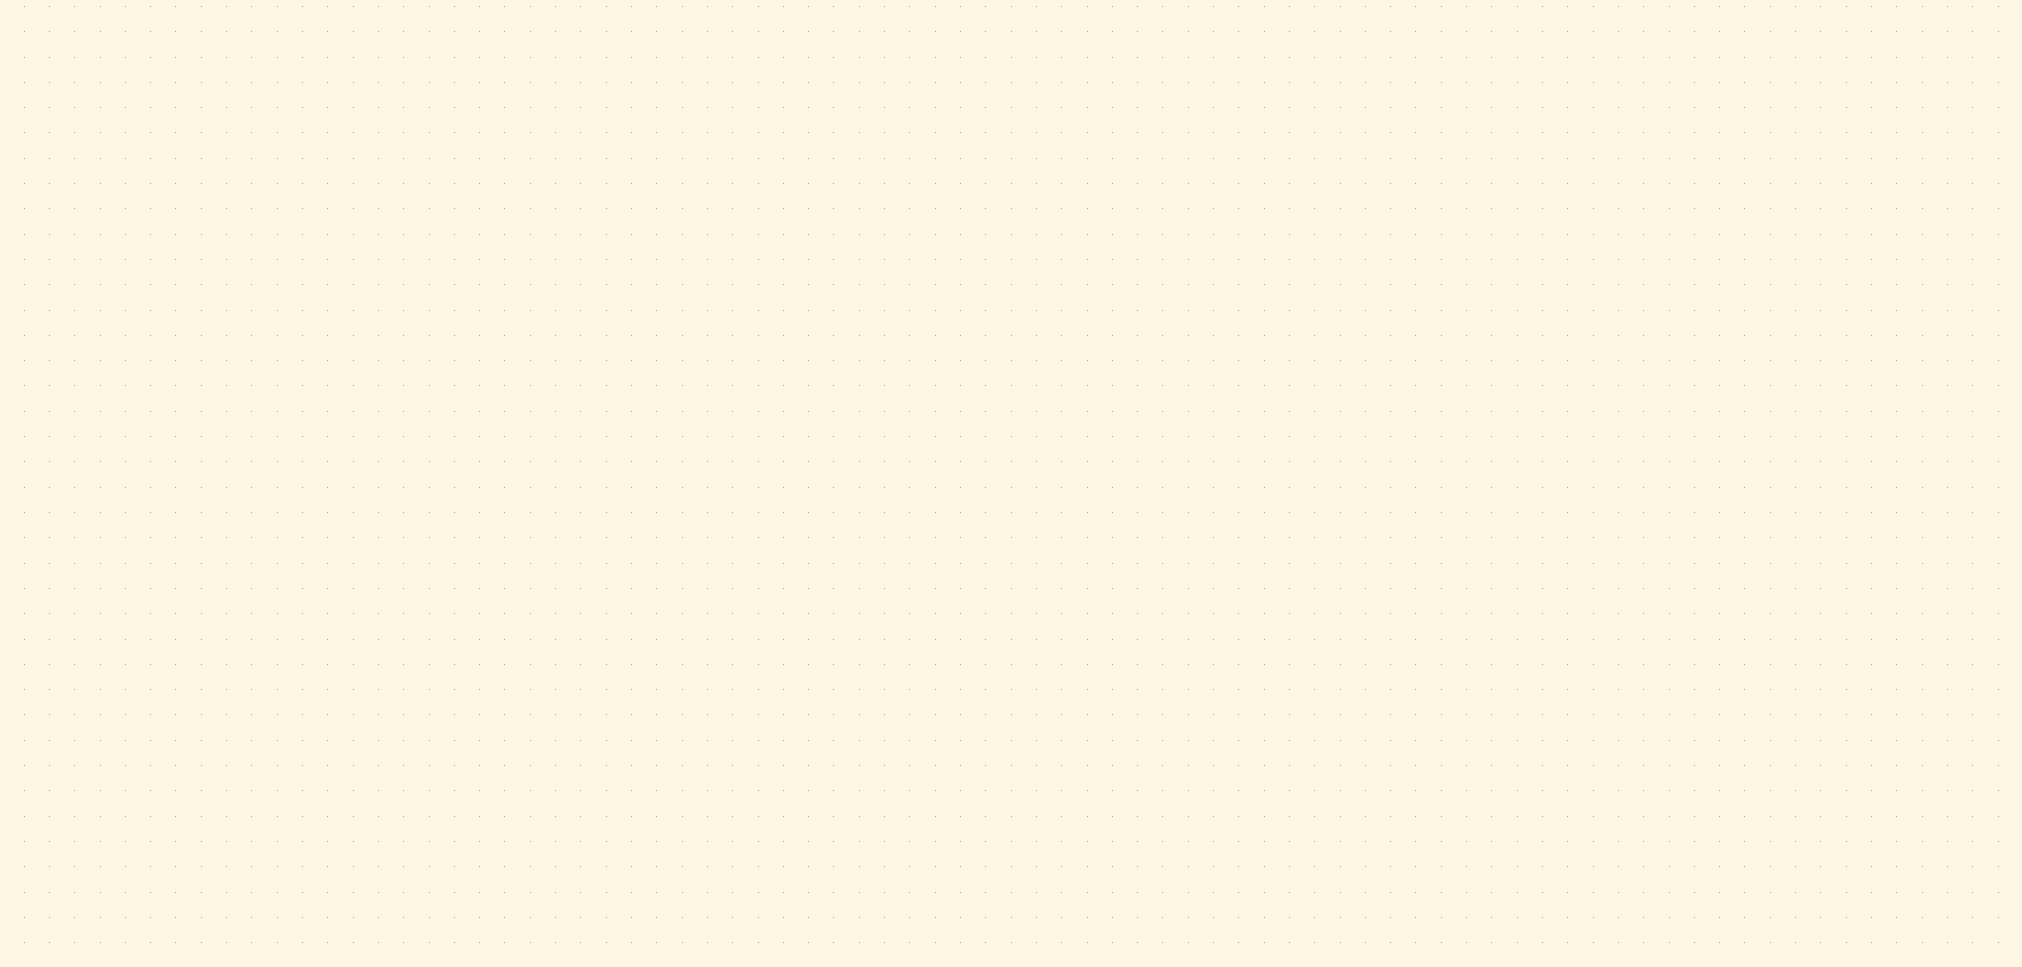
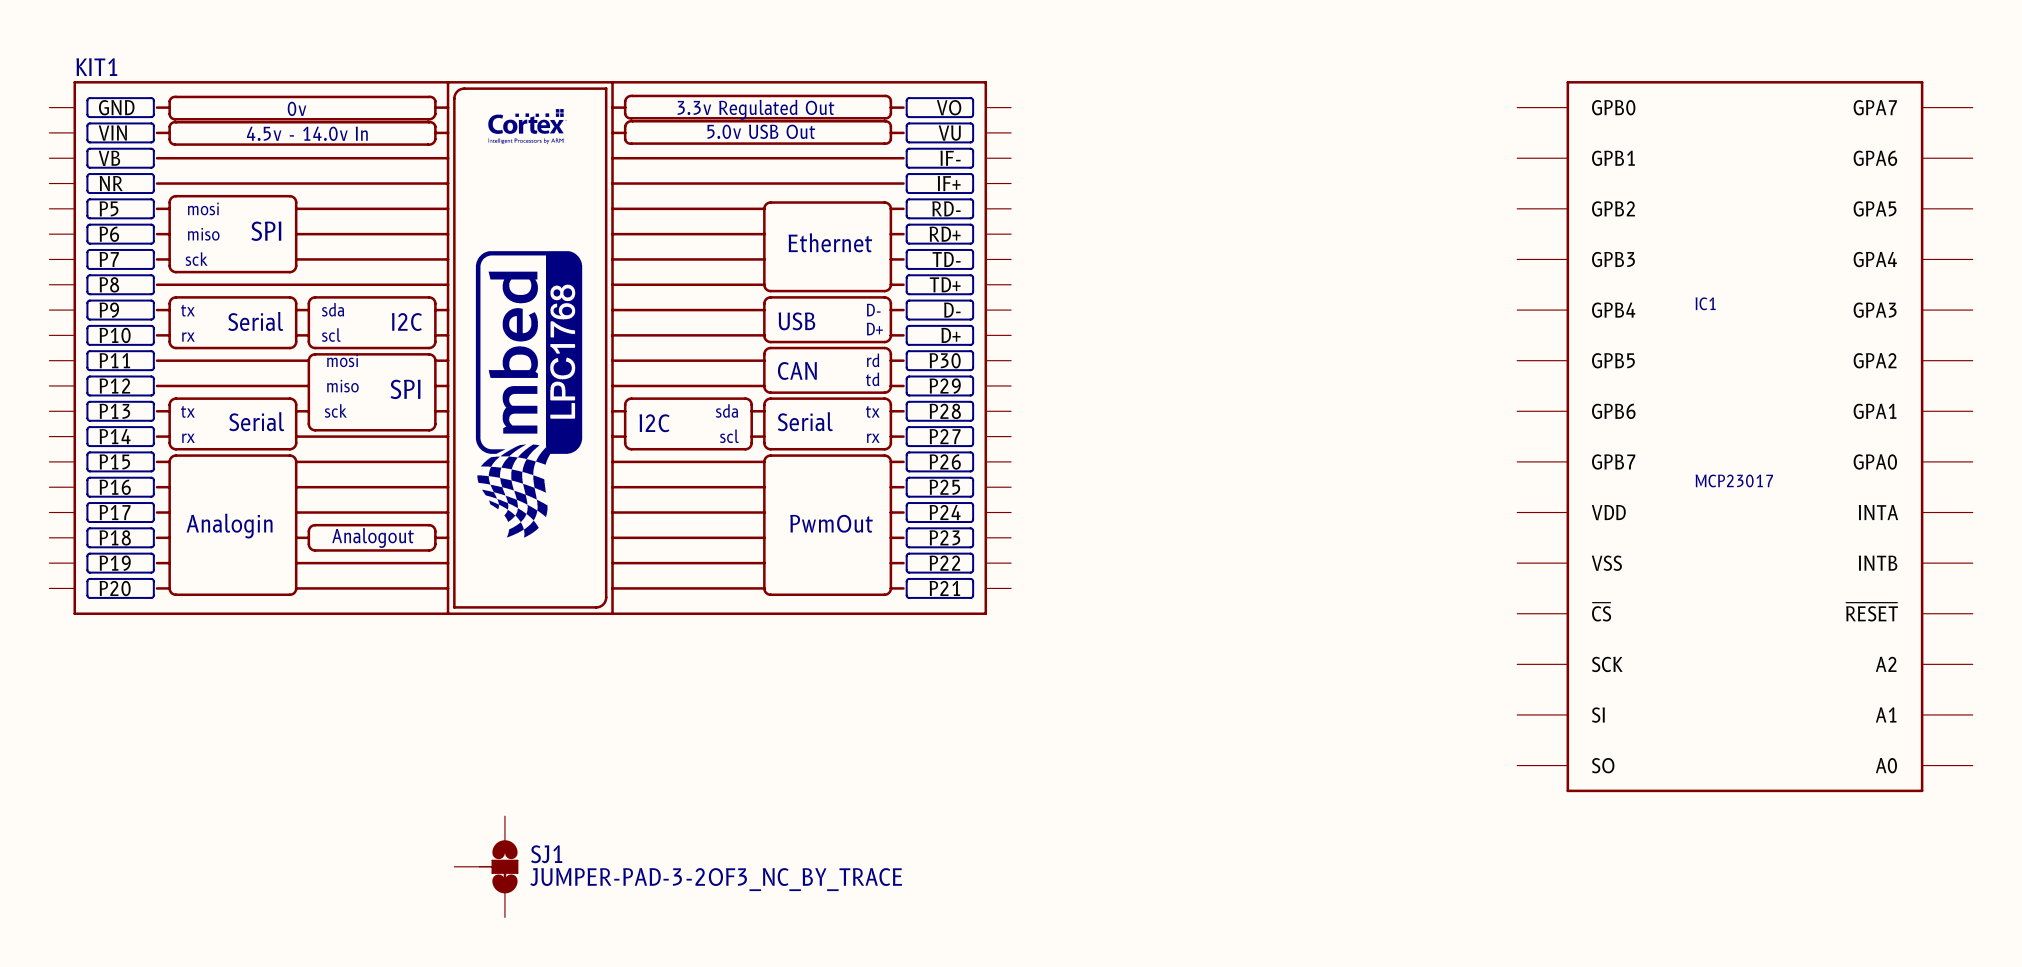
KIT1: none -> (530, 348)
IC1: none -> MCP23017 (1744, 436)
SJ1: none -> JUMPER-PAD-3-2OF3_NC_BY_TRACE (486, 866)

